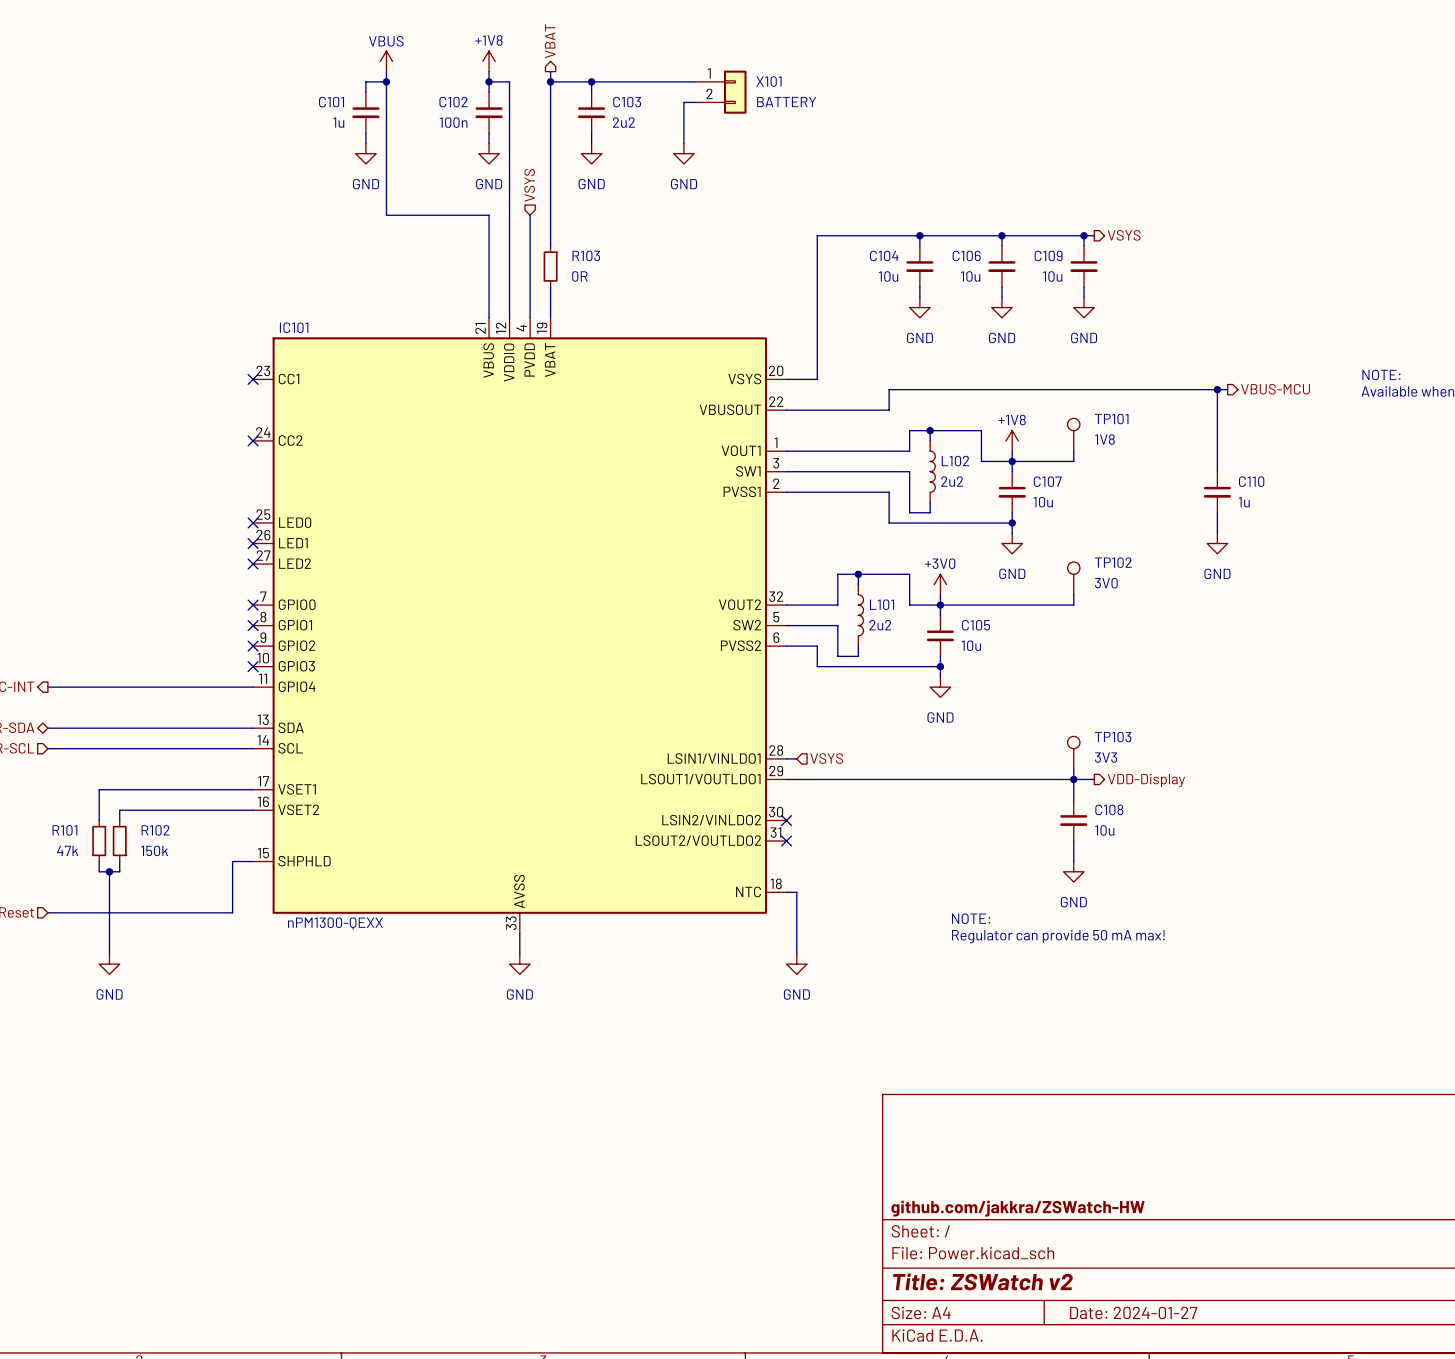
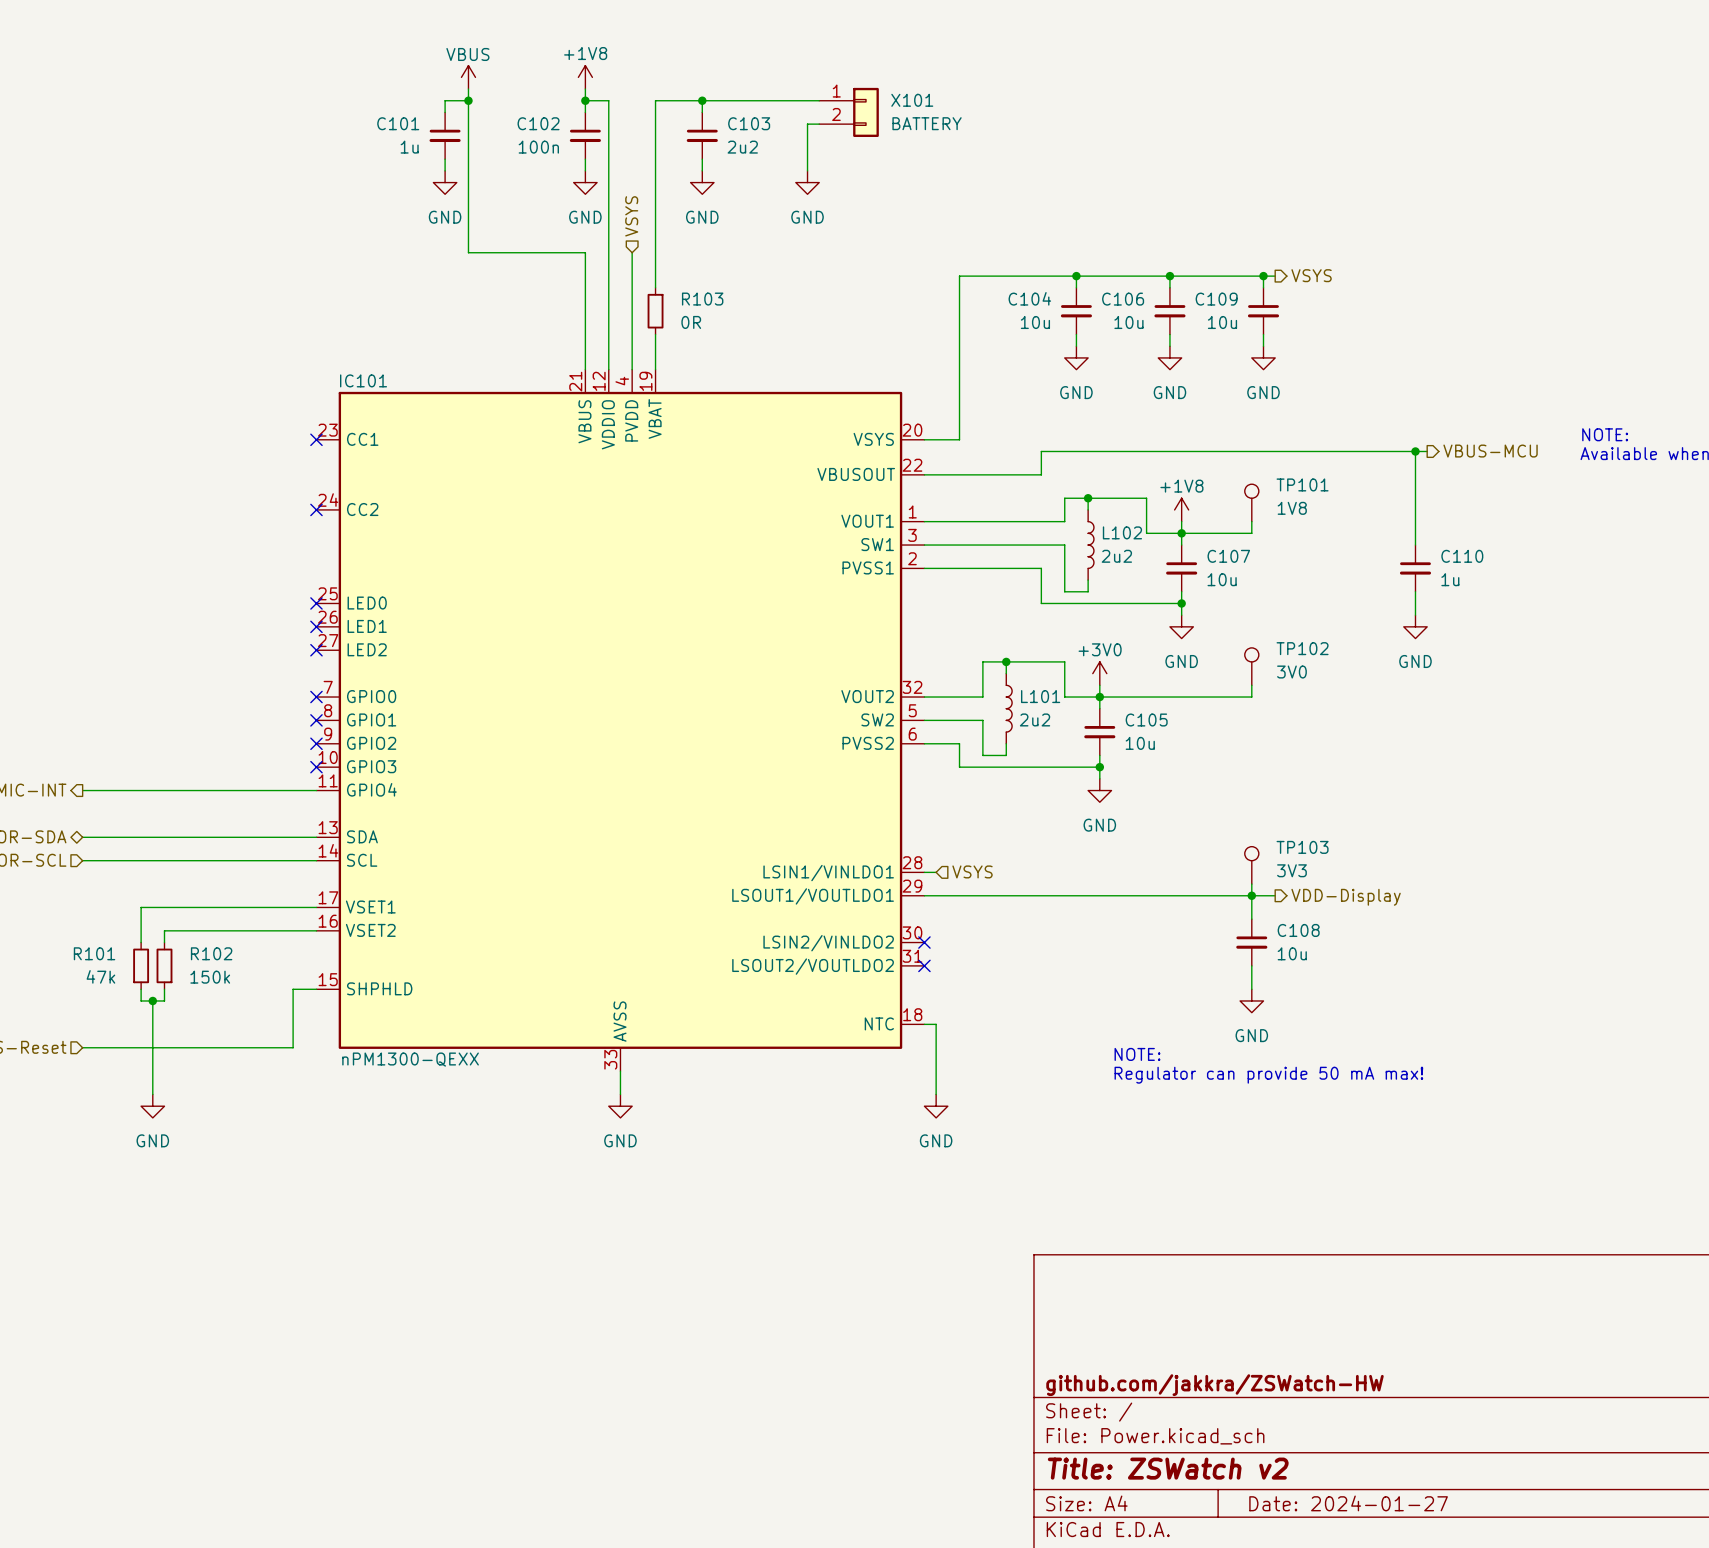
hierarchical label: VBAT (550, 41) -> none
wire: (550, 71) (550, 81) -> none
junction: (550, 81) -> none

